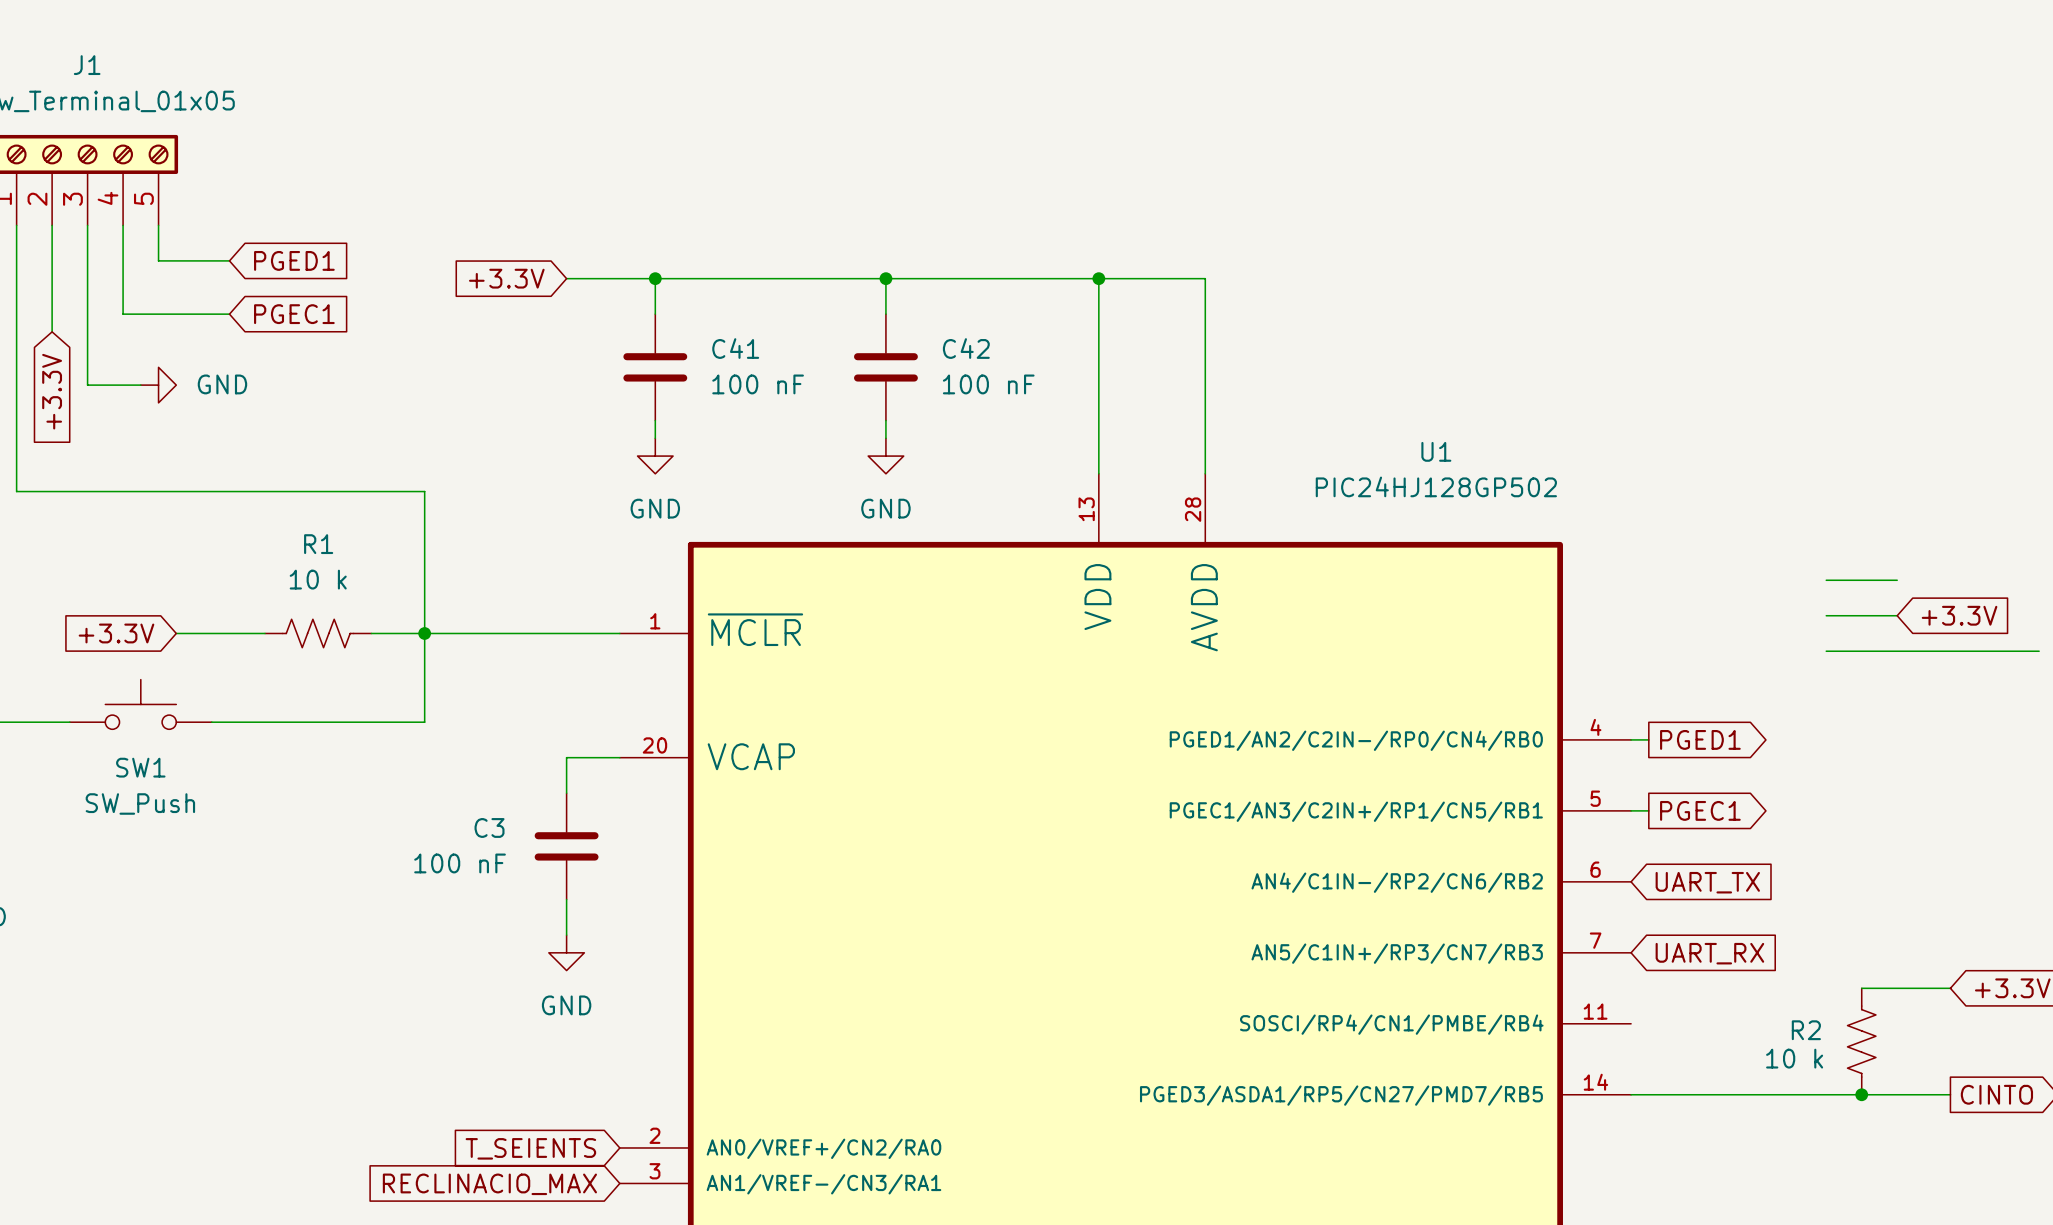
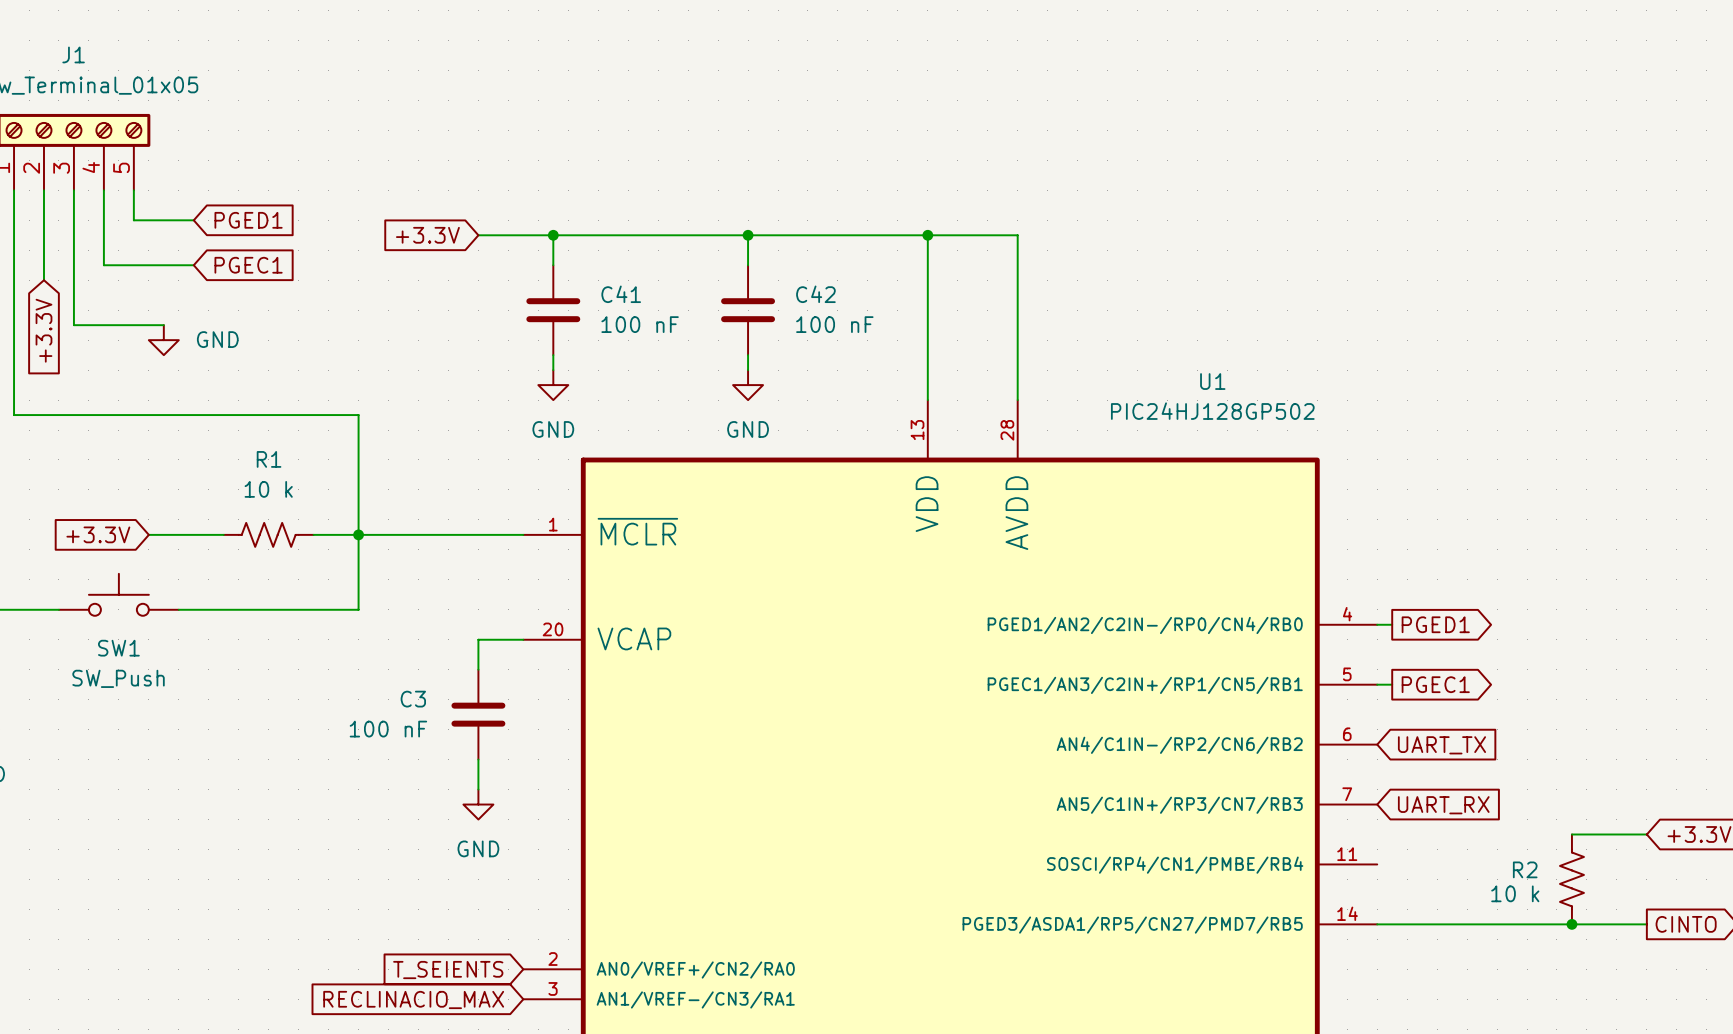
wire: none -> (118, 325) (163, 325)
power symbol rotation: 0° (158, 385) -> 90° clockwise (163, 340)
power symbol position: GND (158, 385) -> GND (163, 340)
wire: (1826, 580) (1897, 580) -> none
wire: (1826, 615) (1897, 615) -> none
global label: +3.3V (1959, 615) -> none
wire: (1826, 651) (2039, 651) -> none

